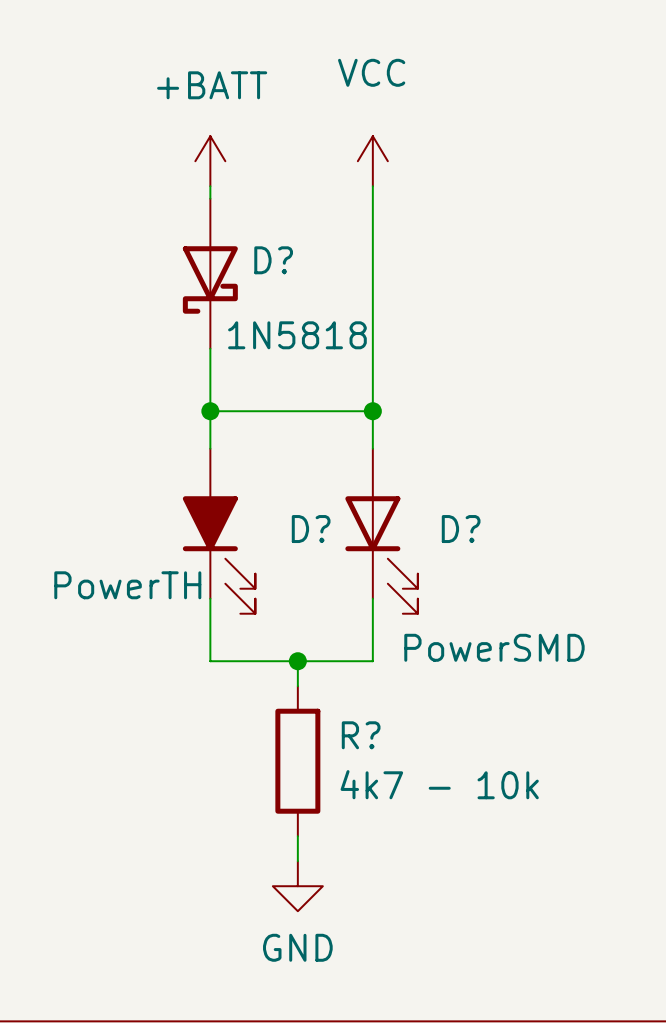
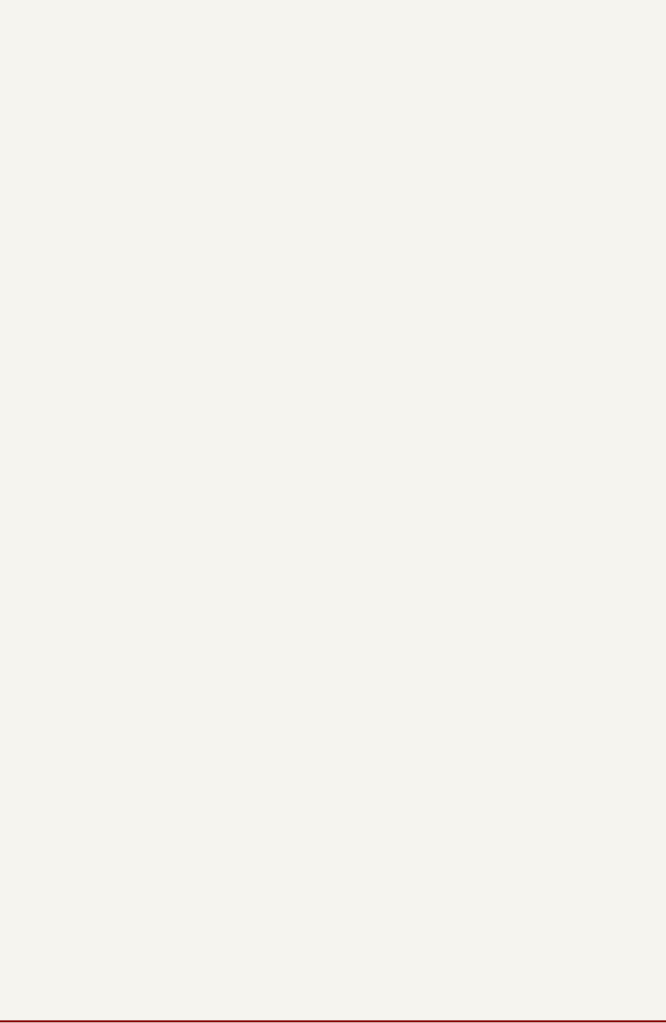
power symbol: +BATT (210, 161) -> none
power symbol: VCC (372, 161) -> none
wire: (210, 186) (210, 198) -> none
wire: (372, 186) (372, 448) -> none
D?: 1N5818 (210, 273) -> none
wire: (210, 348) (210, 448) -> none
wire: (210, 411) (372, 411) -> none
junction: (210, 411) -> none
junction: (372, 411) -> none
D?: PowerTH (219, 531) -> none
D?: PowerSMD (381, 531) -> none
wire: (210, 598) (210, 661) (372, 661) (372, 598) -> none
wire: (297, 661) (297, 686) -> none
junction: (297, 661) -> none
R?: 4k7 - 10k (297, 761) -> none
wire: (297, 836) (297, 861) -> none
power symbol: GND (297, 886) -> none

